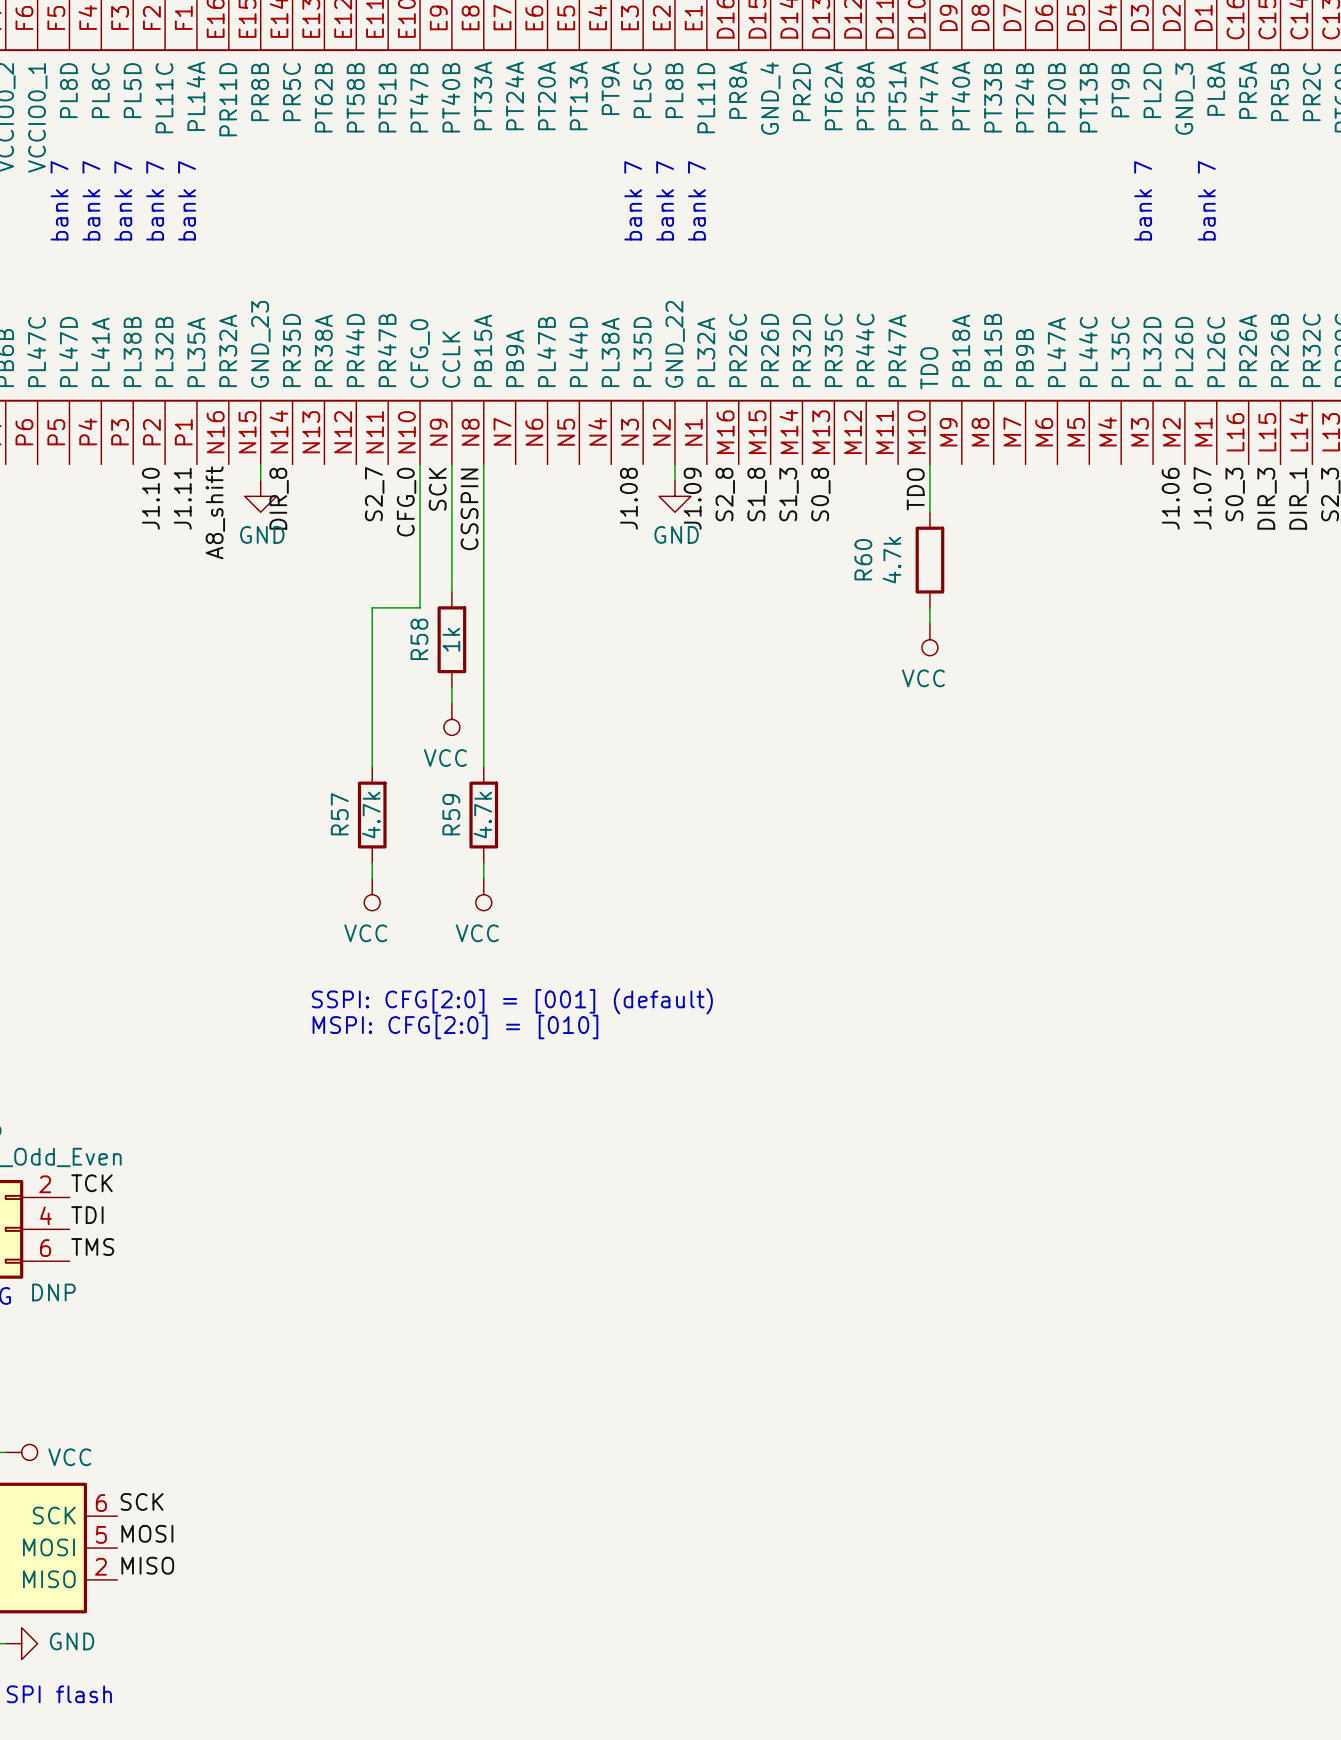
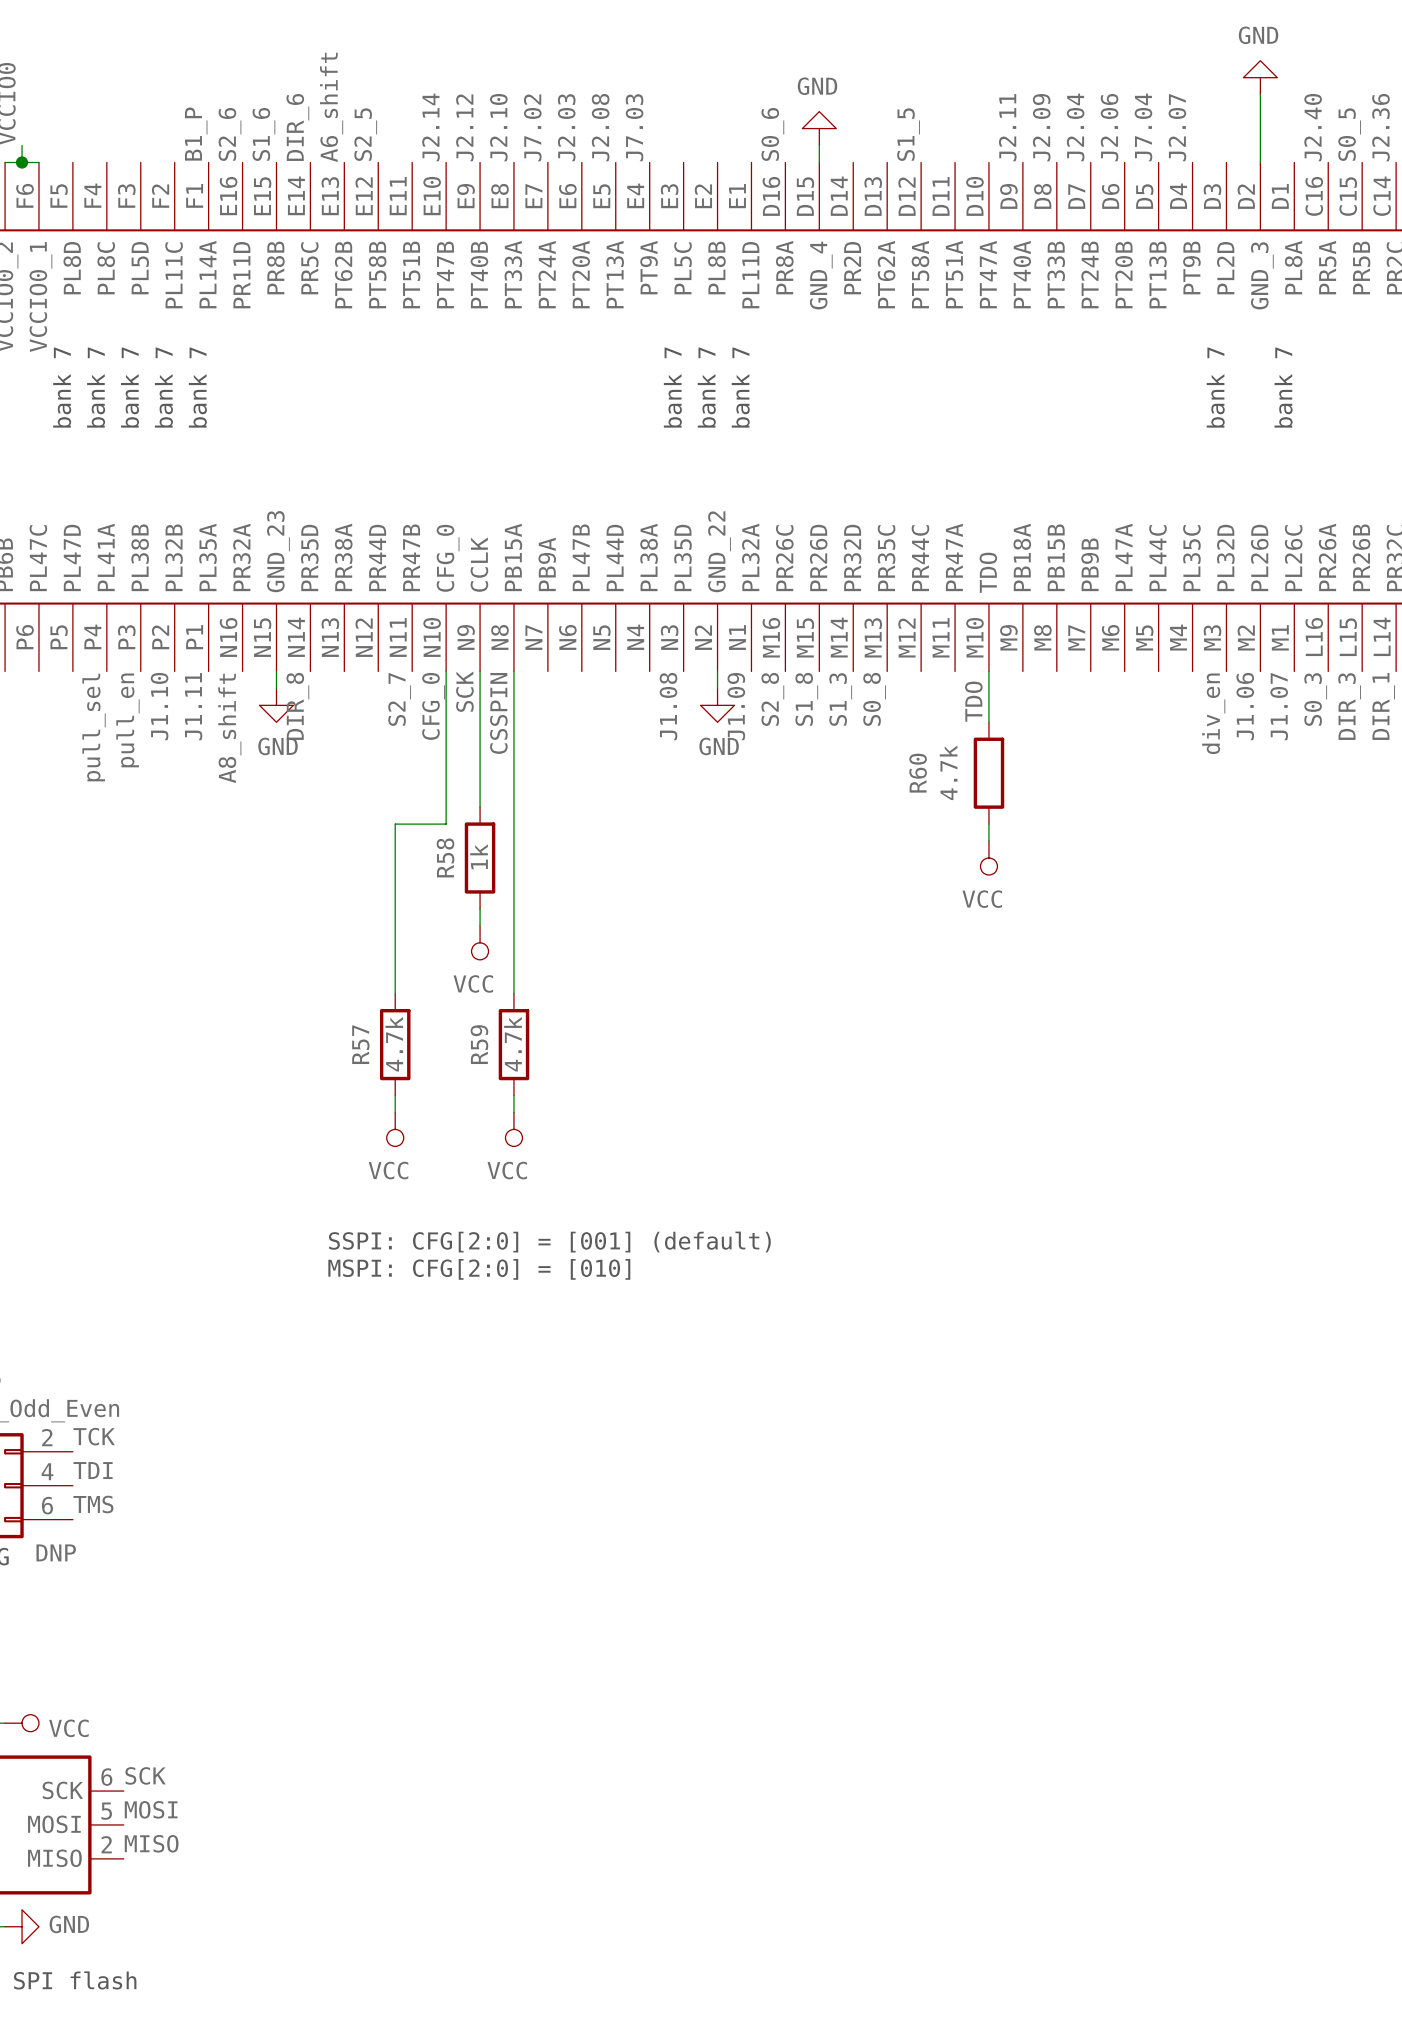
label: none -> div_en (1213, 713)
label: none -> pull_en (127, 720)
label: none -> pull_sel (94, 727)

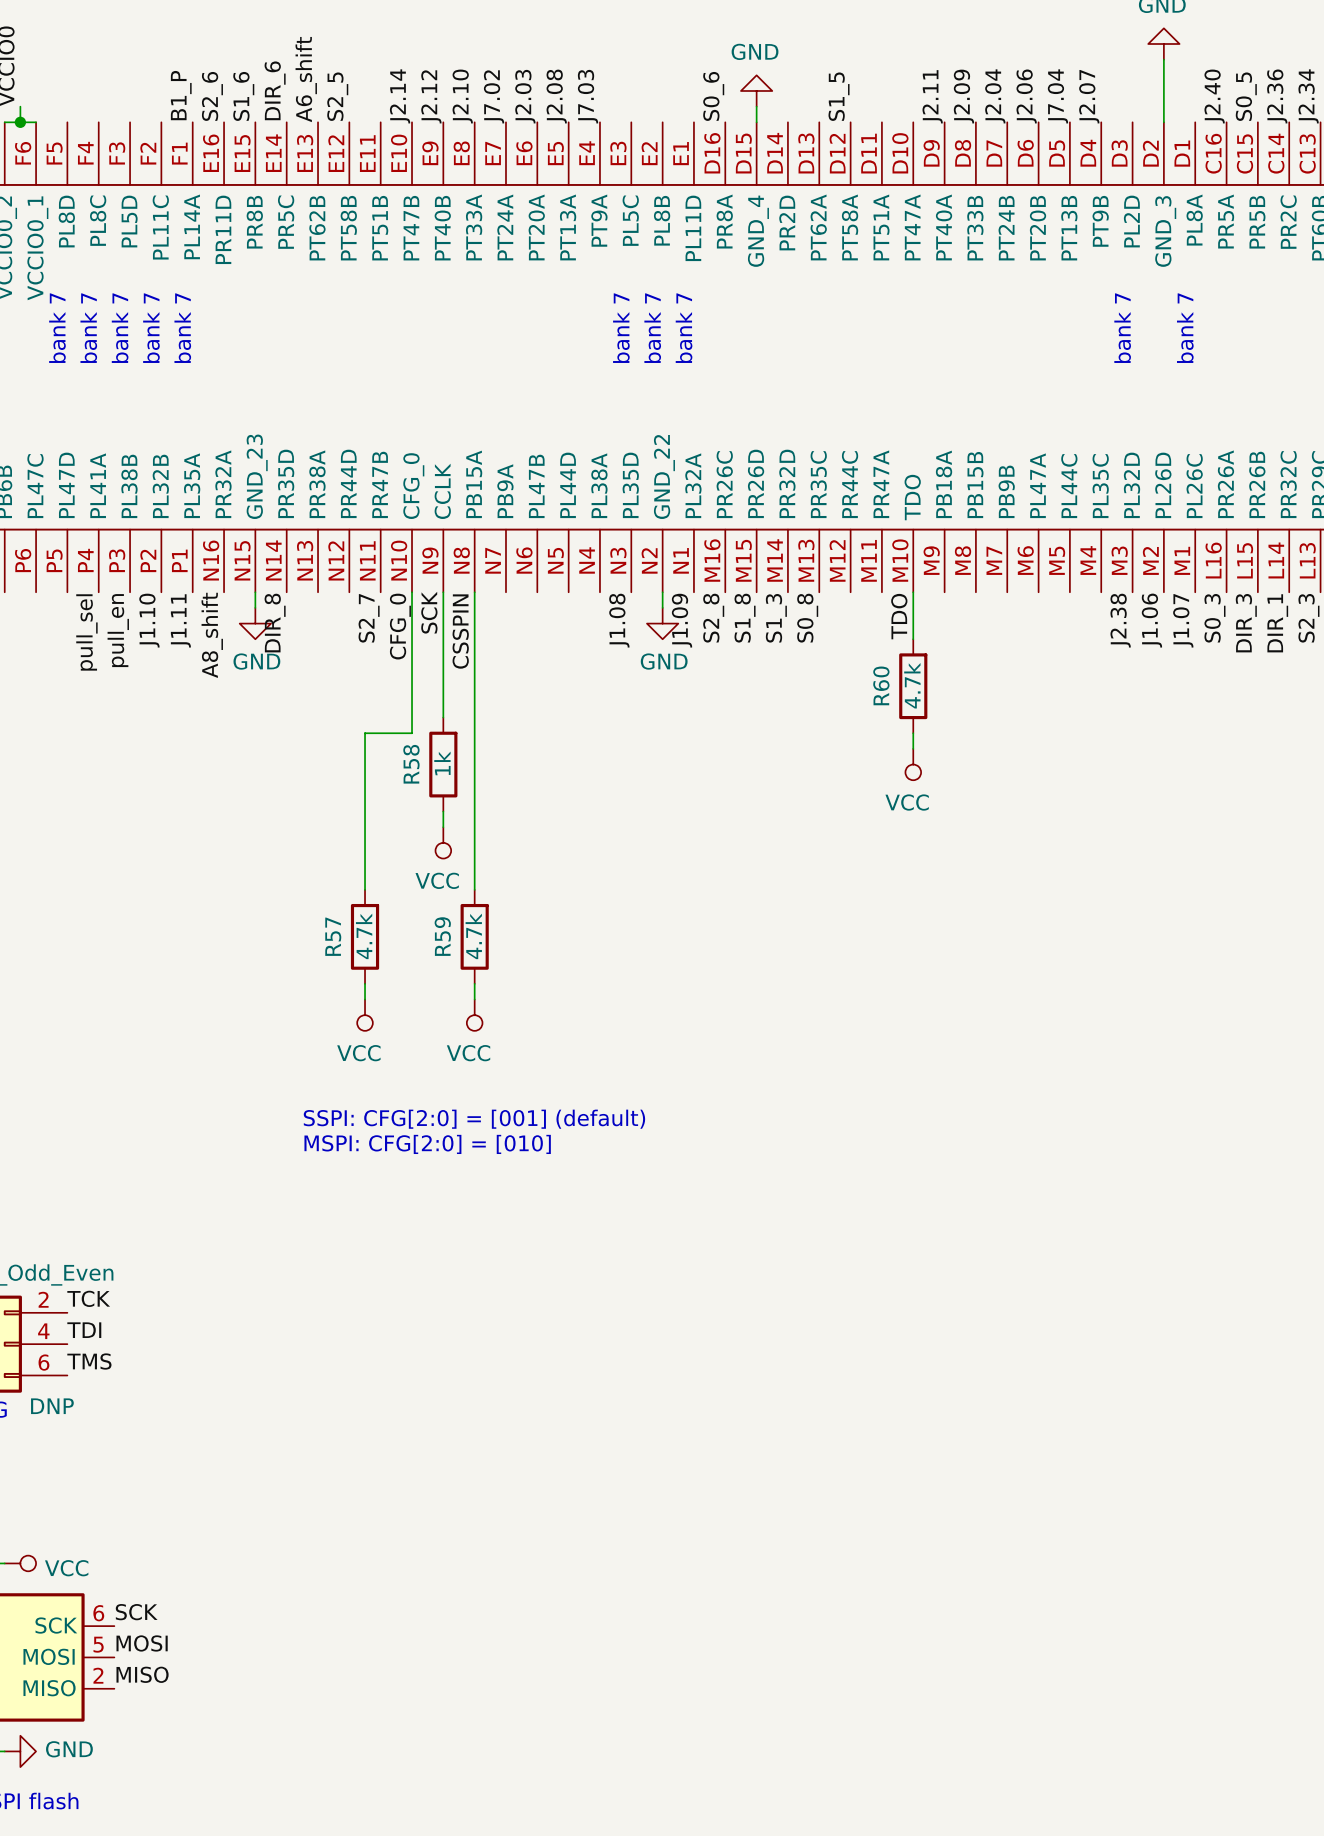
label: div_en (1213, 713) -> J2.38 (1120, 620)
R60 value position: 4.7k (948, 772) -> 4.7k (912, 685)
R60 name position: R60 (918, 773) -> R60 (881, 685)

